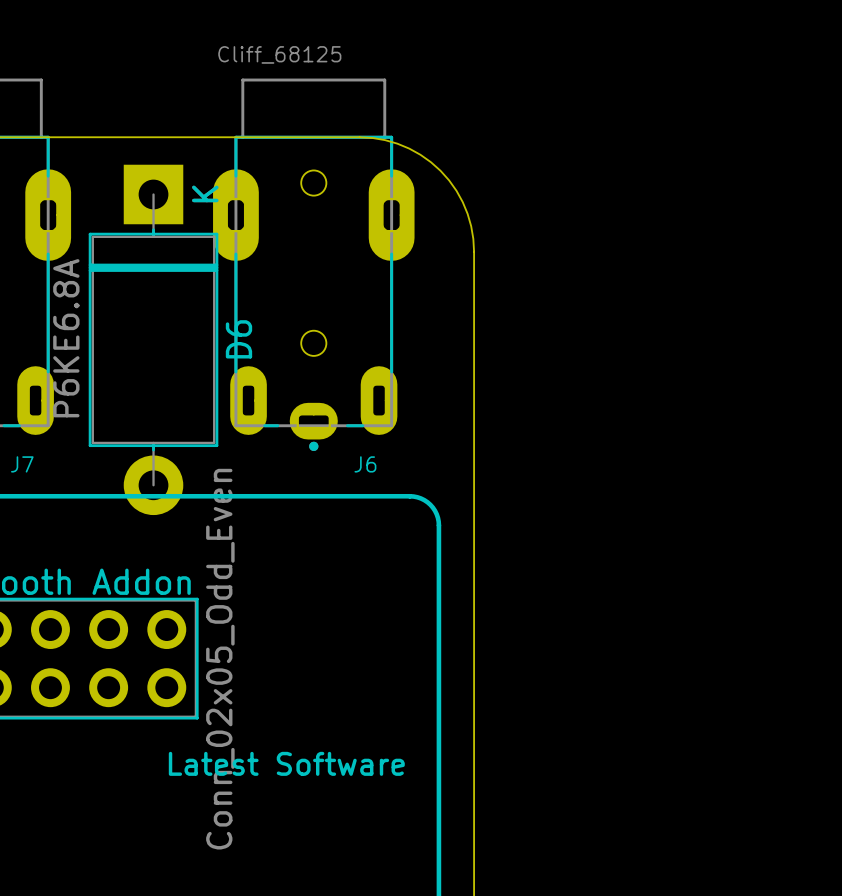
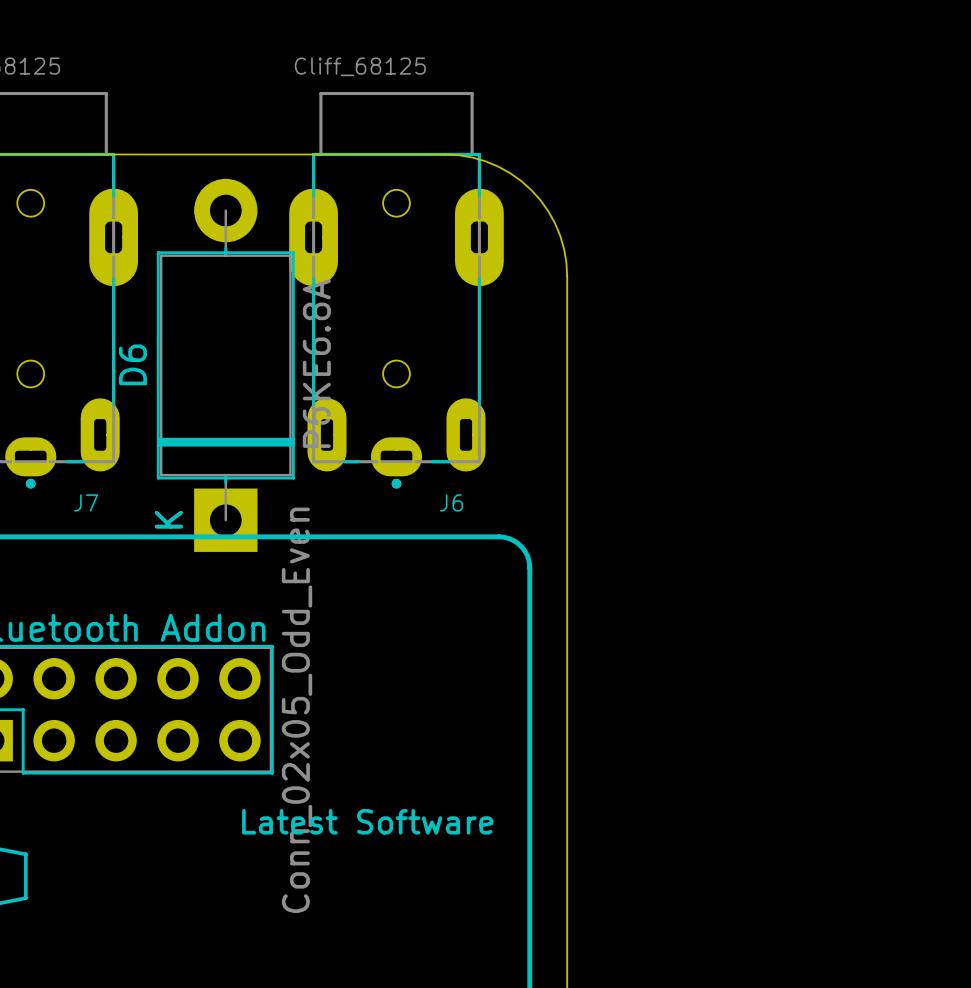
D6 rotation: 0° (153, 339) -> 180° (225, 365)

